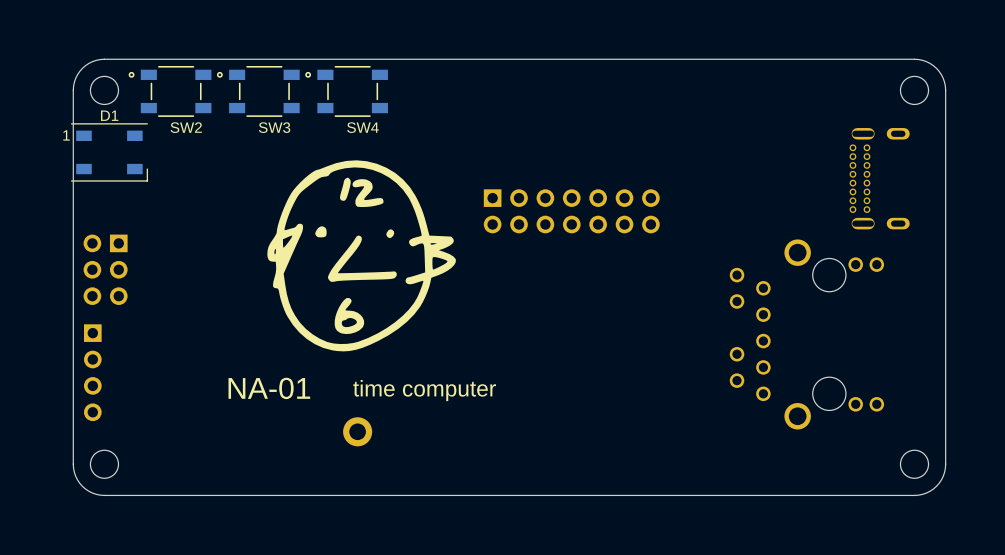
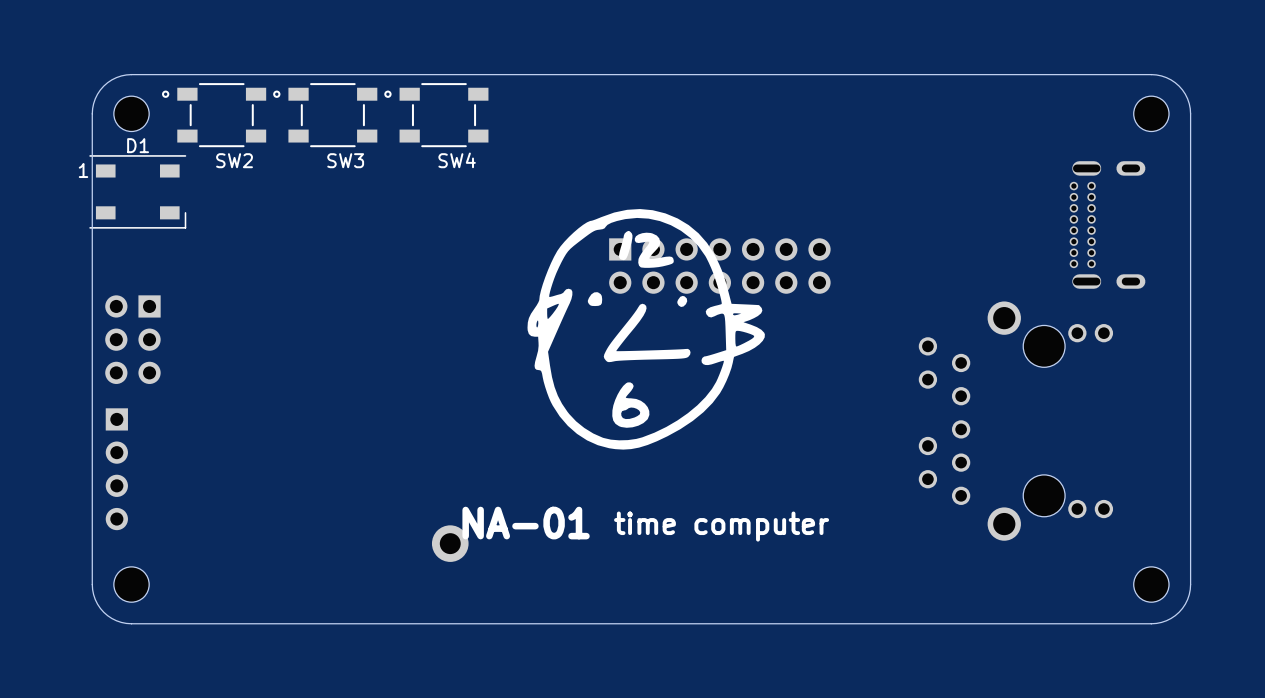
drawing position: (361, 255) -> (646, 329)
text position: NA-01 (269, 388) -> NA-01 (526, 523)
text position: time computer (424, 390) -> time computer (721, 526)

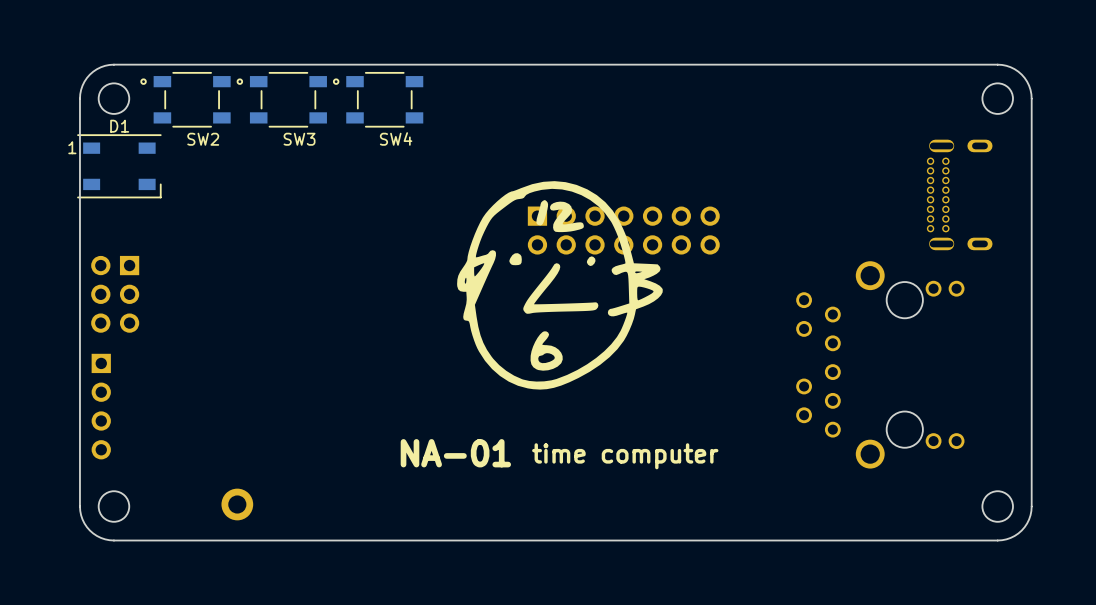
part position: (450, 543) -> (237, 504)

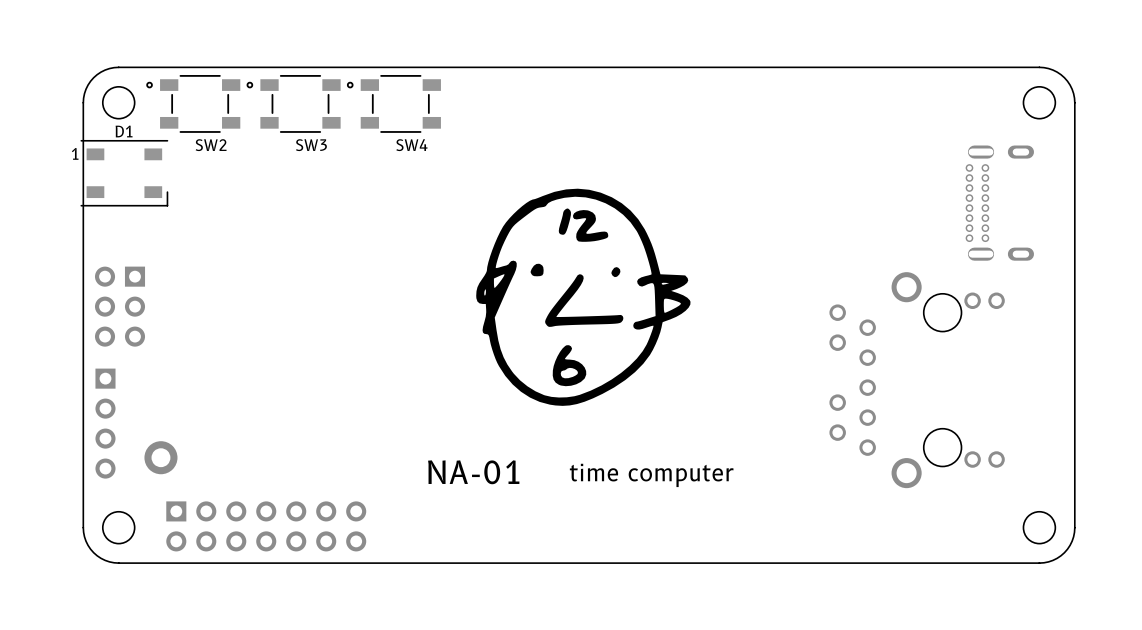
part: (623, 230) -> none
part position: (237, 504) -> (160, 457)
part: none -> (266, 526)

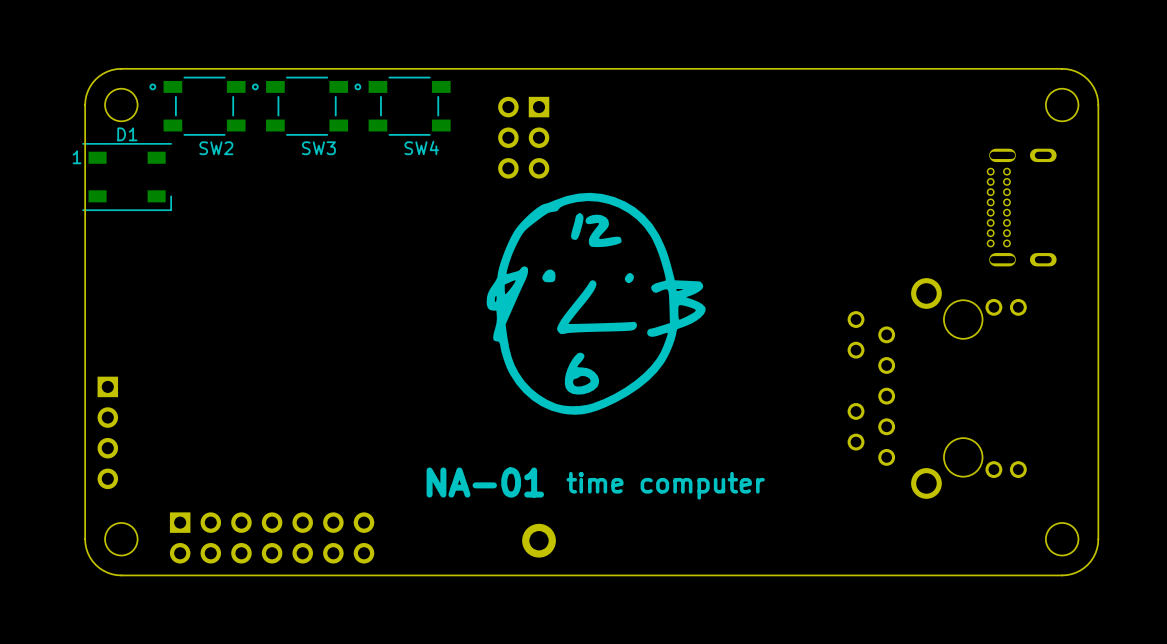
part: none -> (523, 137)
part: (120, 306) -> none
part: (160, 457) -> none
part: none -> (539, 540)

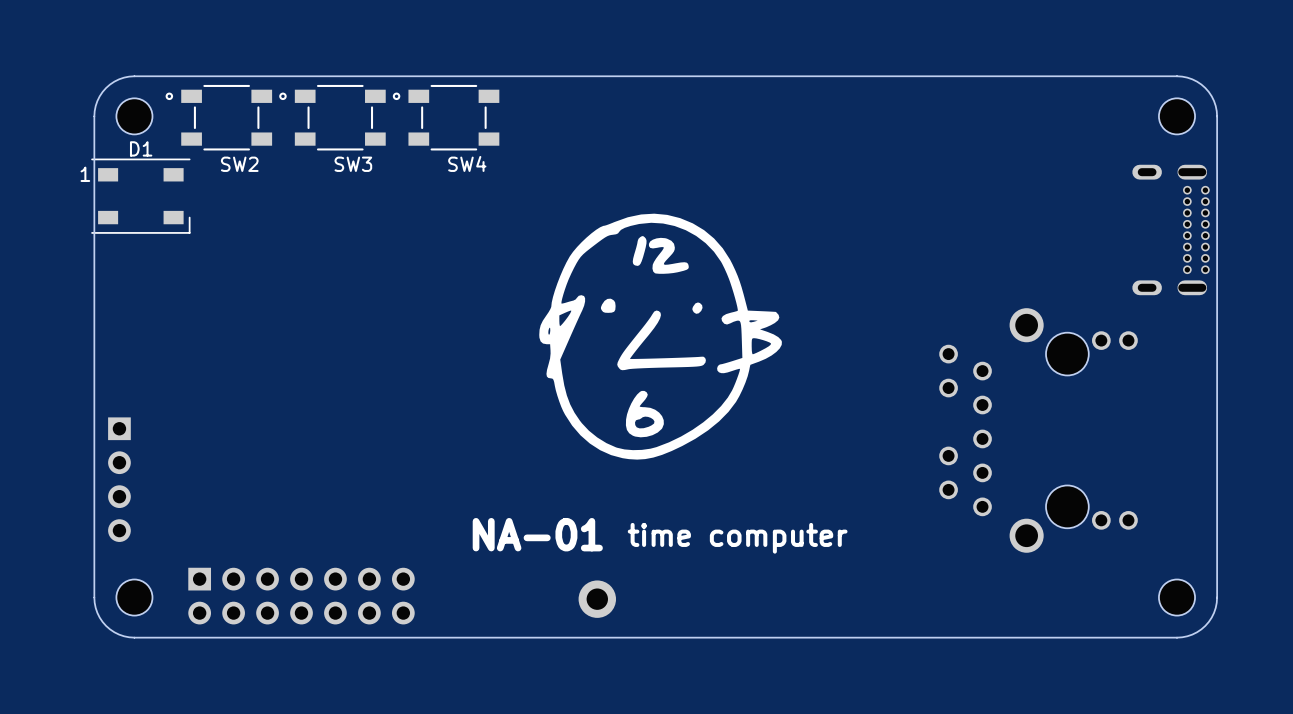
part: (523, 137) -> none
part rotation: 0° (1021, 207) -> 180° (1171, 229)

